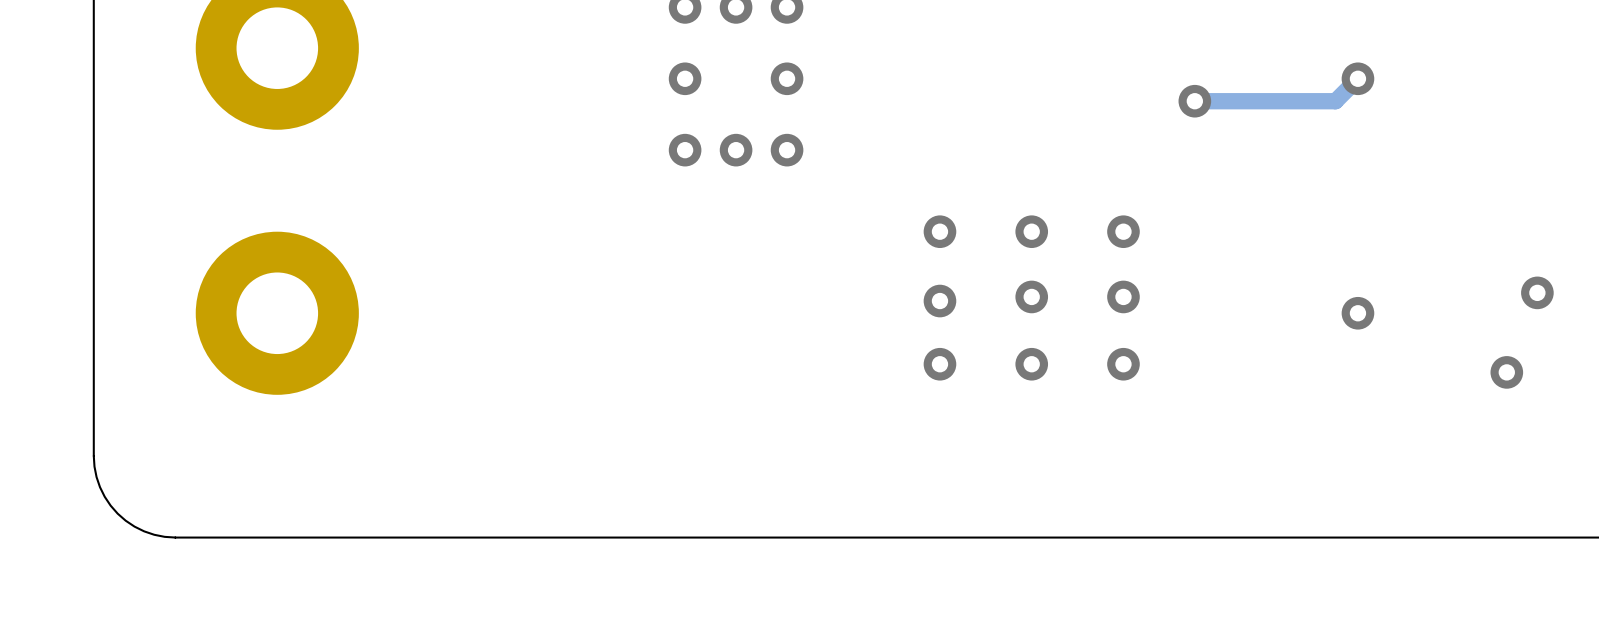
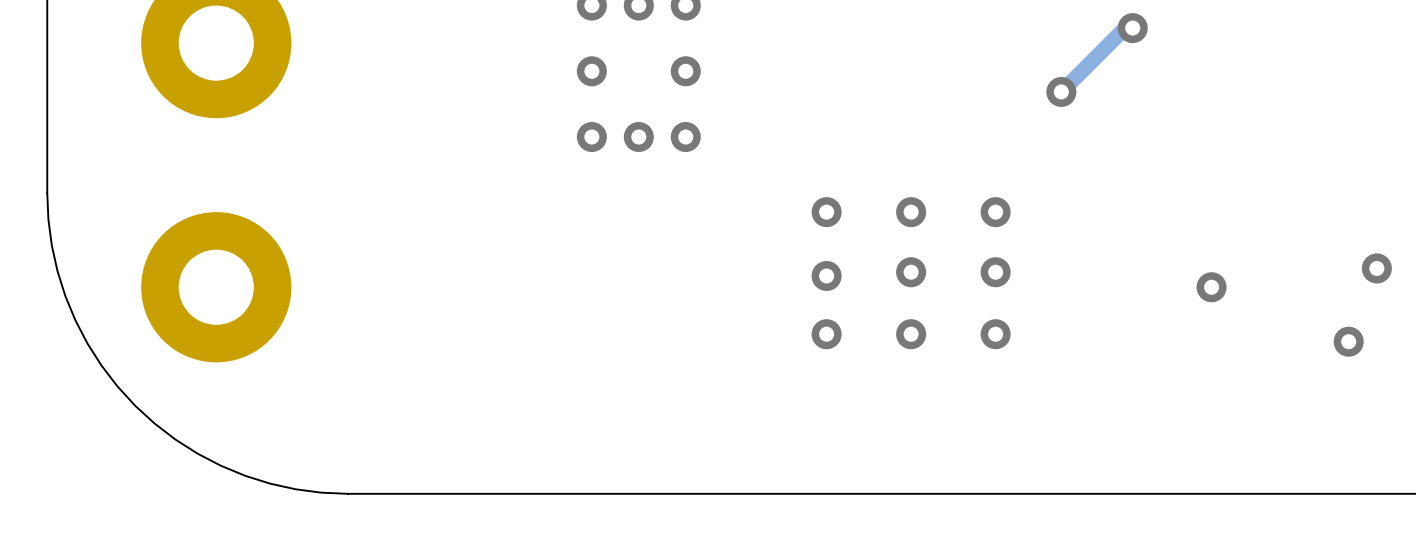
track: (1357, 78) (1335, 101) (1194, 101) -> (1132, 28) (1125, 28) (1061, 91)
via position: (1357, 78) -> (1132, 28)
board edge: (93, 211) (94, 466) (104, 496) (117, 513) (144, 531) (164, 536) (420, 537) -> (47, 193) (51, 245) (65, 296) (87, 343) (117, 386) (135, 405) (175, 439) (220, 465) (244, 475) (295, 489) (347, 493)

